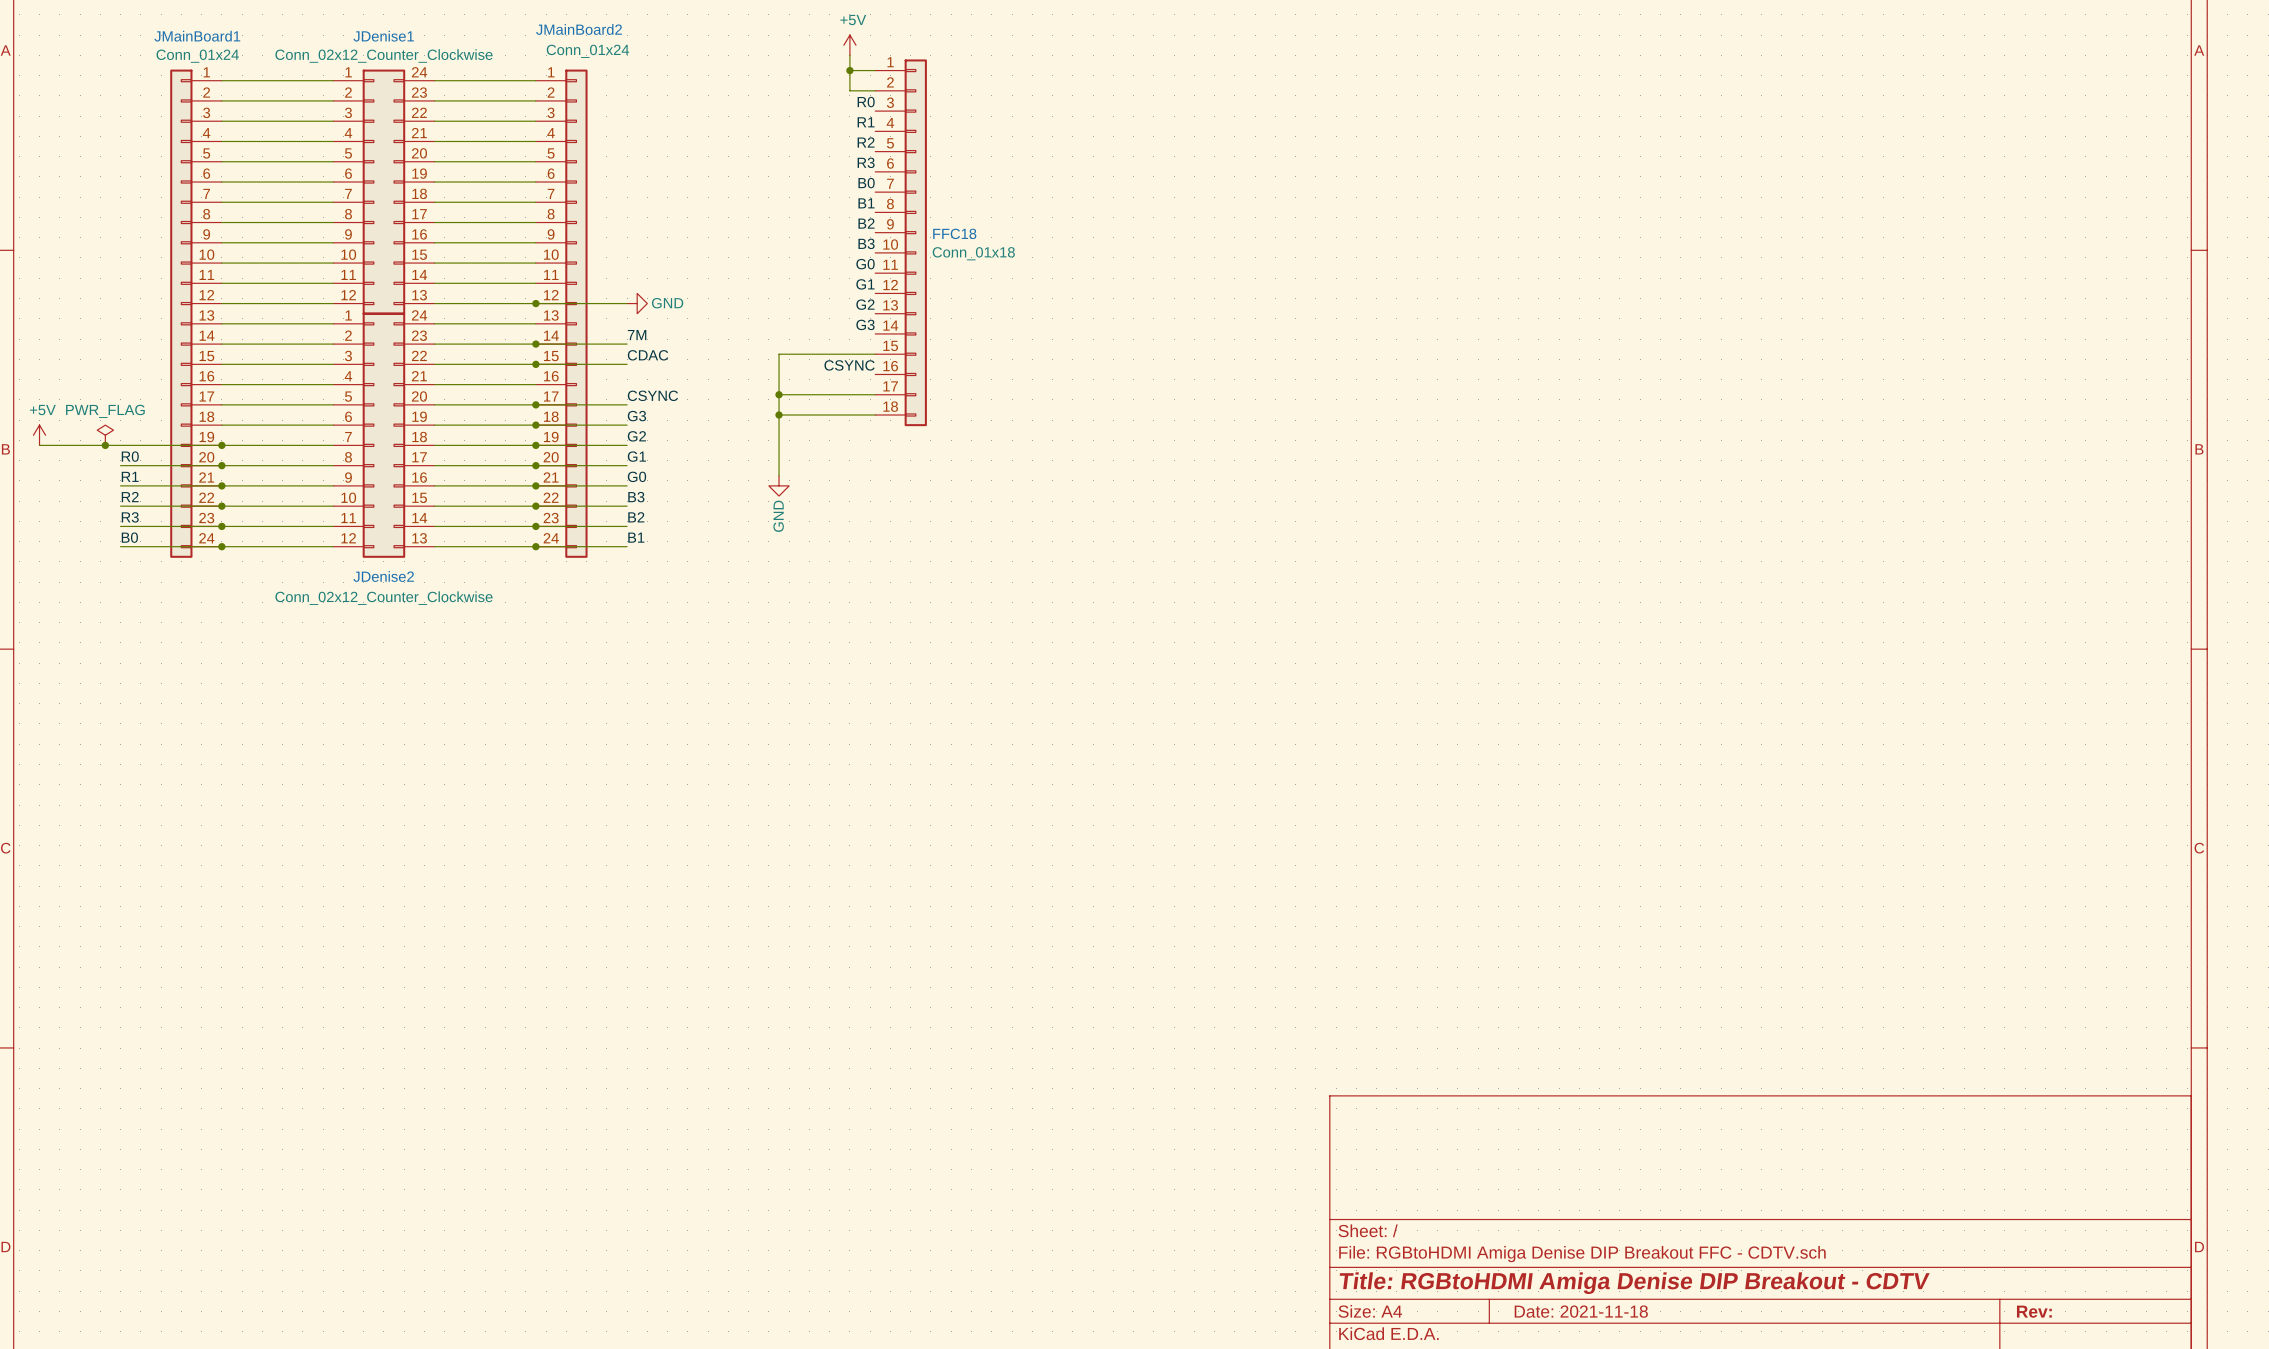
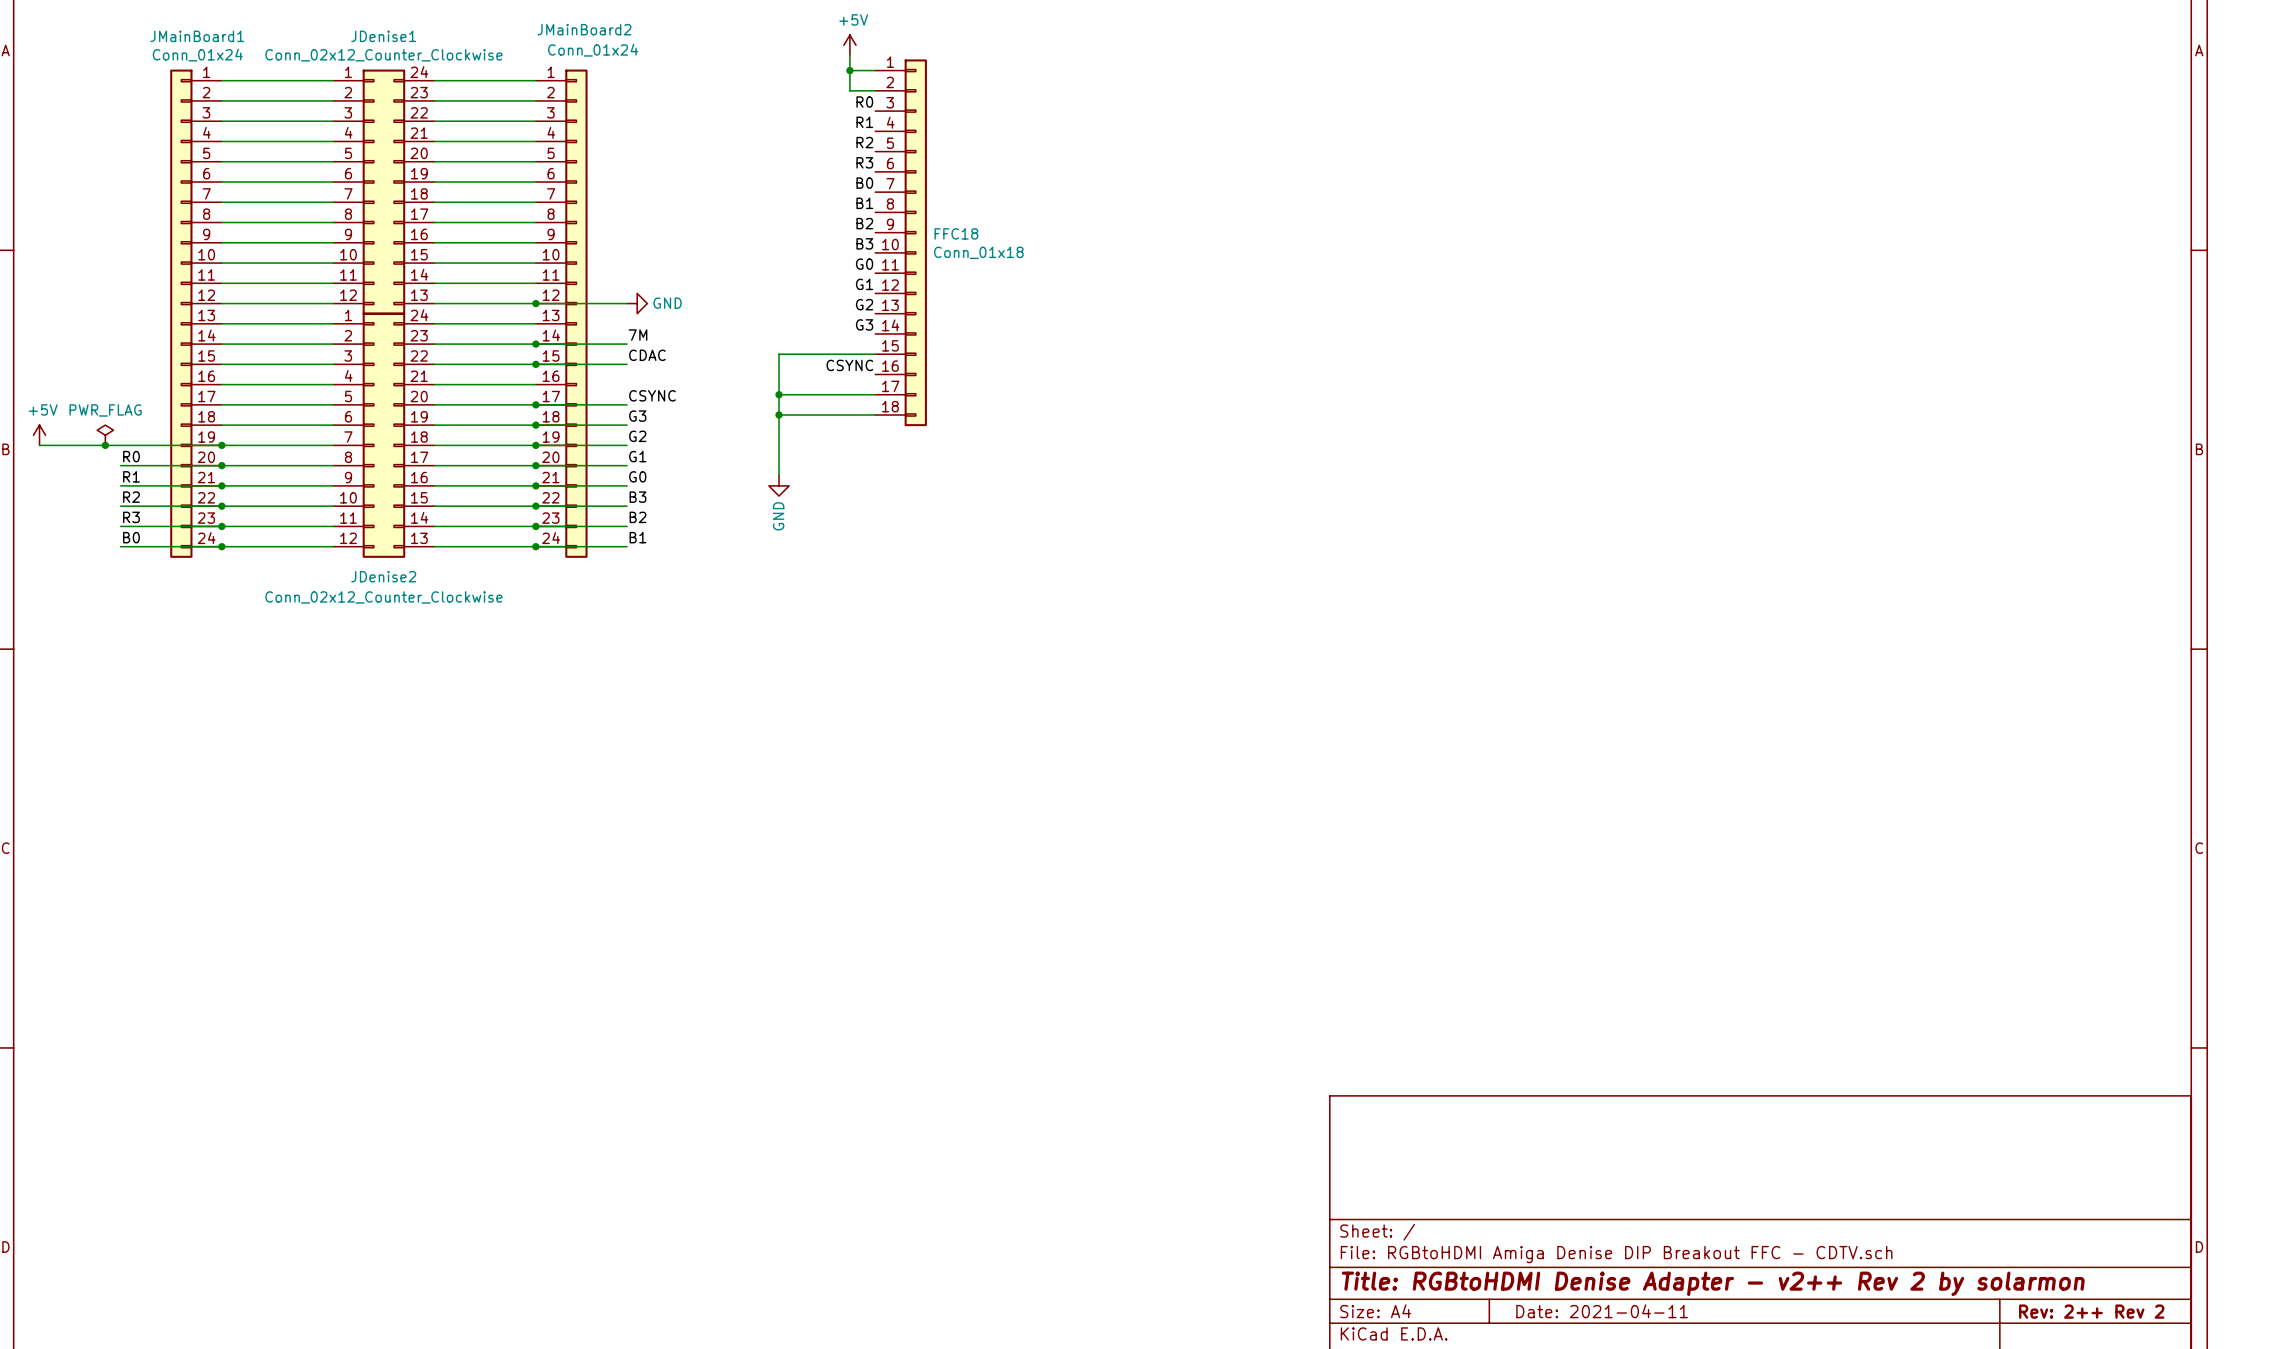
title block: Title: RGBtoHDMI Amiga Denise DIP Breakout - CDTV (1634, 1283) -> Title: RGBtoHDMI Denise Adapter - v2++ Rev 2 by solarmon (1713, 1283)
title block: Date: 2021-11-18 (1581, 1311) -> Date: 2021-04-11 (1602, 1311)
title block: Rev: (2034, 1311) -> Rev: 2++ Rev 2 (2091, 1311)

